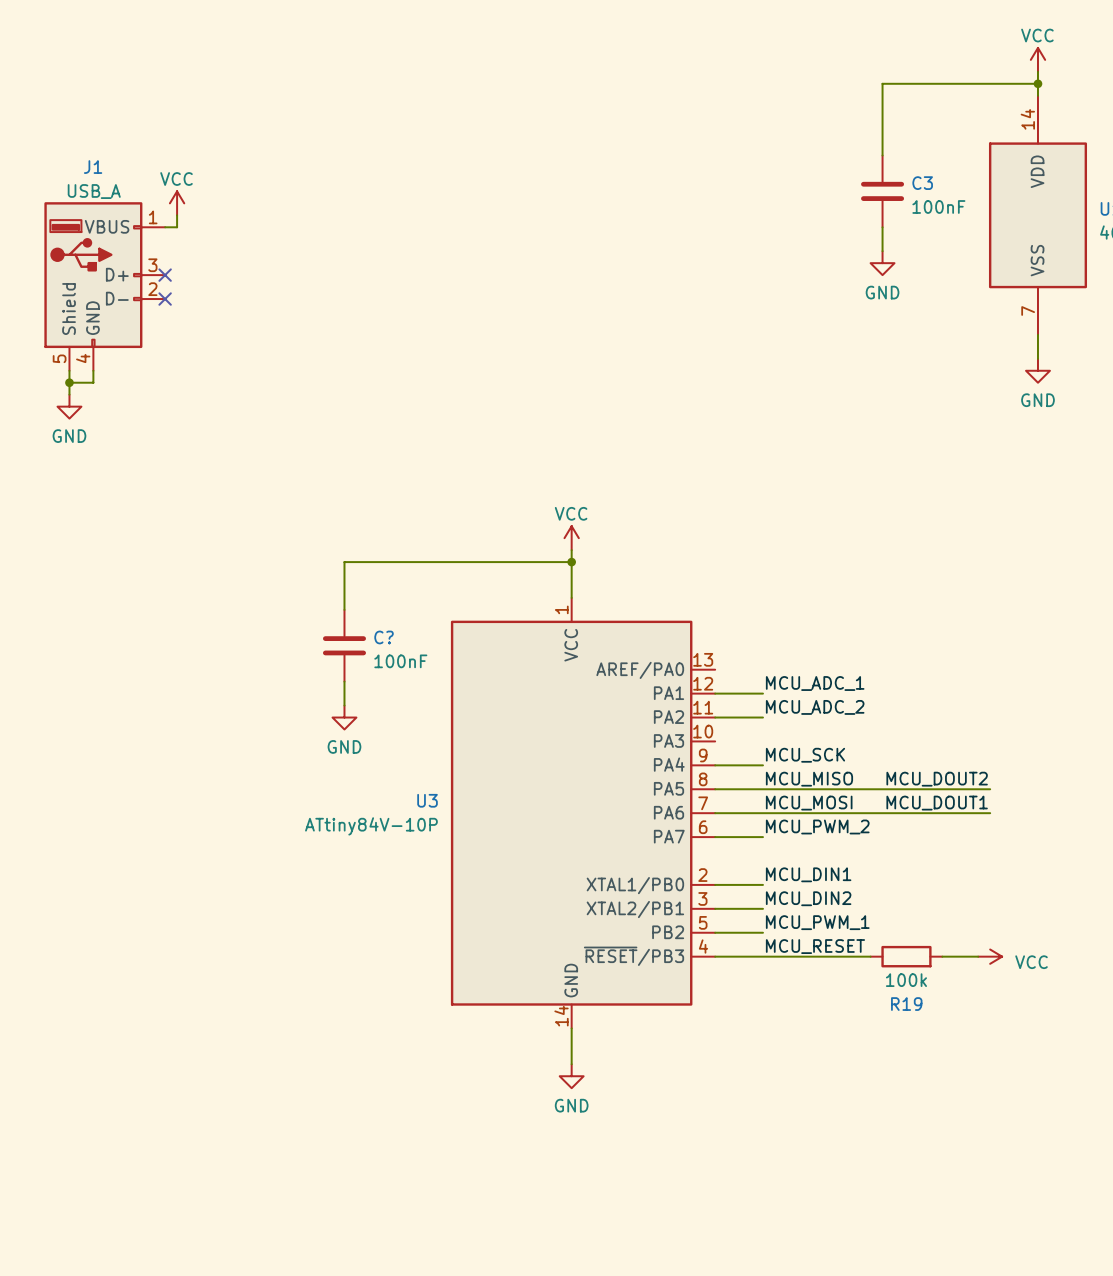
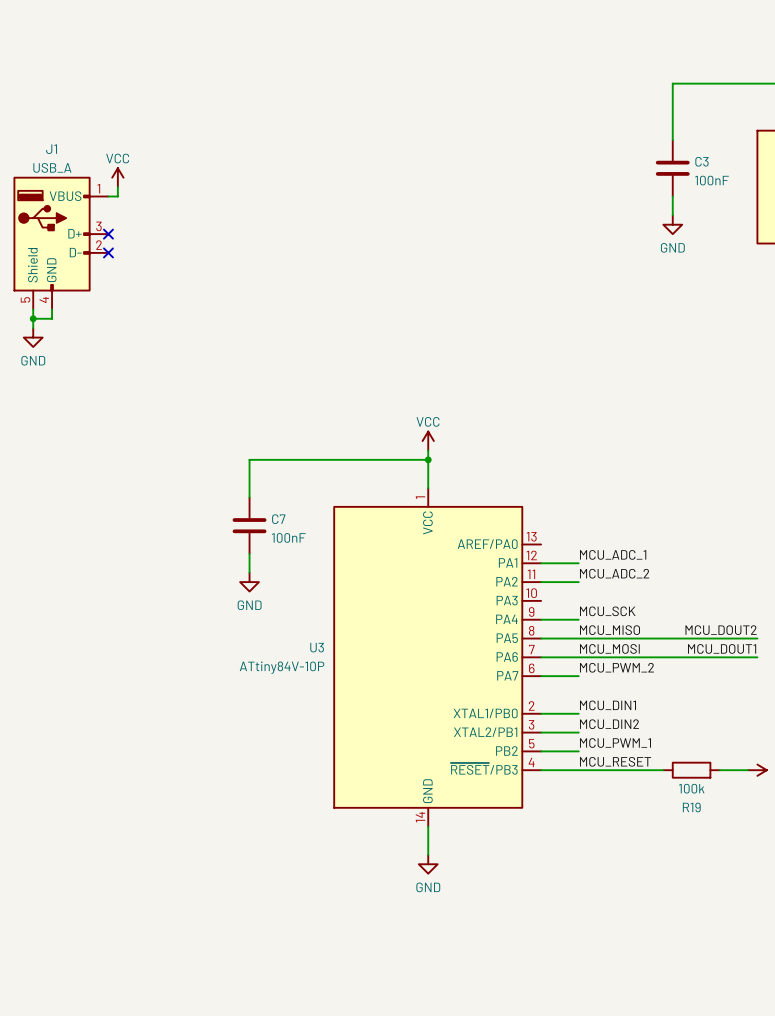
C? name: C? (384, 637) -> C7 (278, 519)

